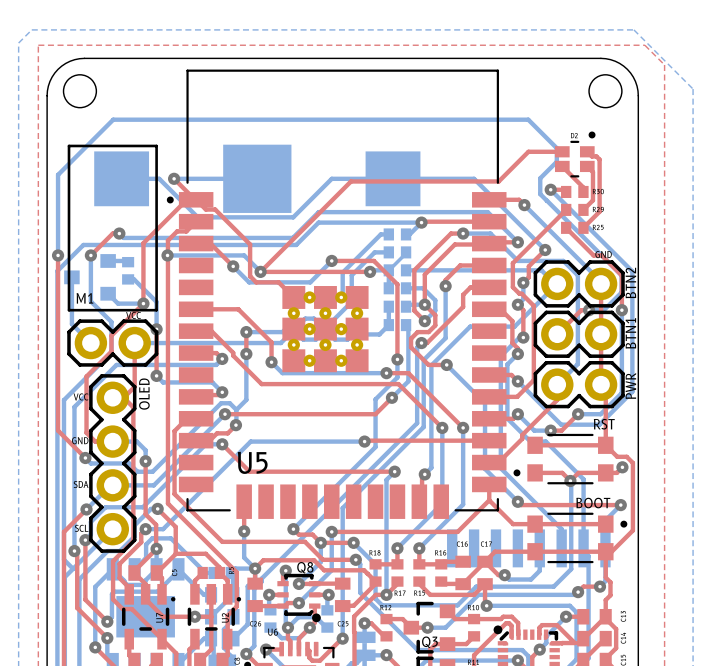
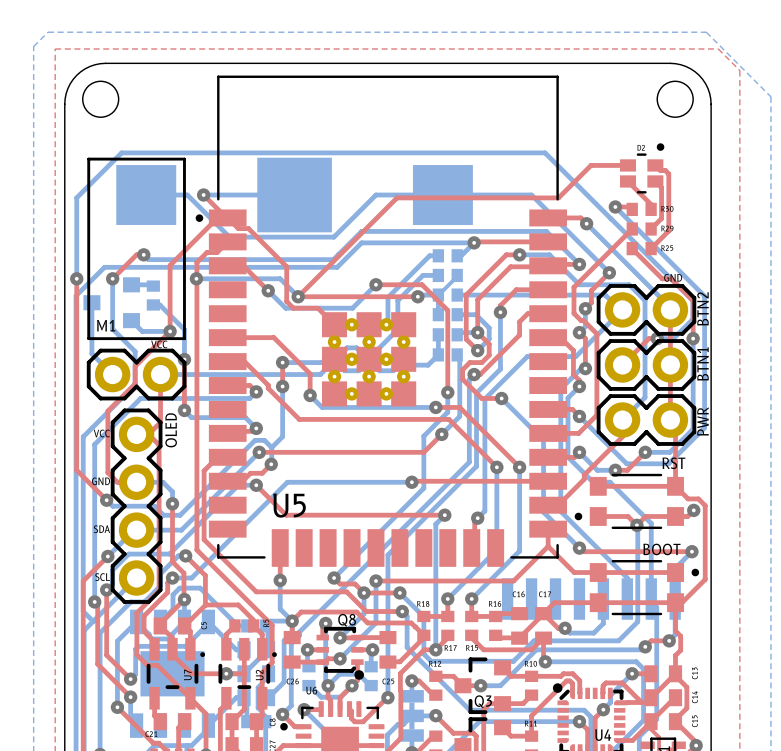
bottom track: (58, 181) (58, 174) (113, 119) (528, 119) (556, 148) (556, 161) (540, 178) (540, 194) -> (76, 197) (121, 152) (545, 152) (603, 211)

